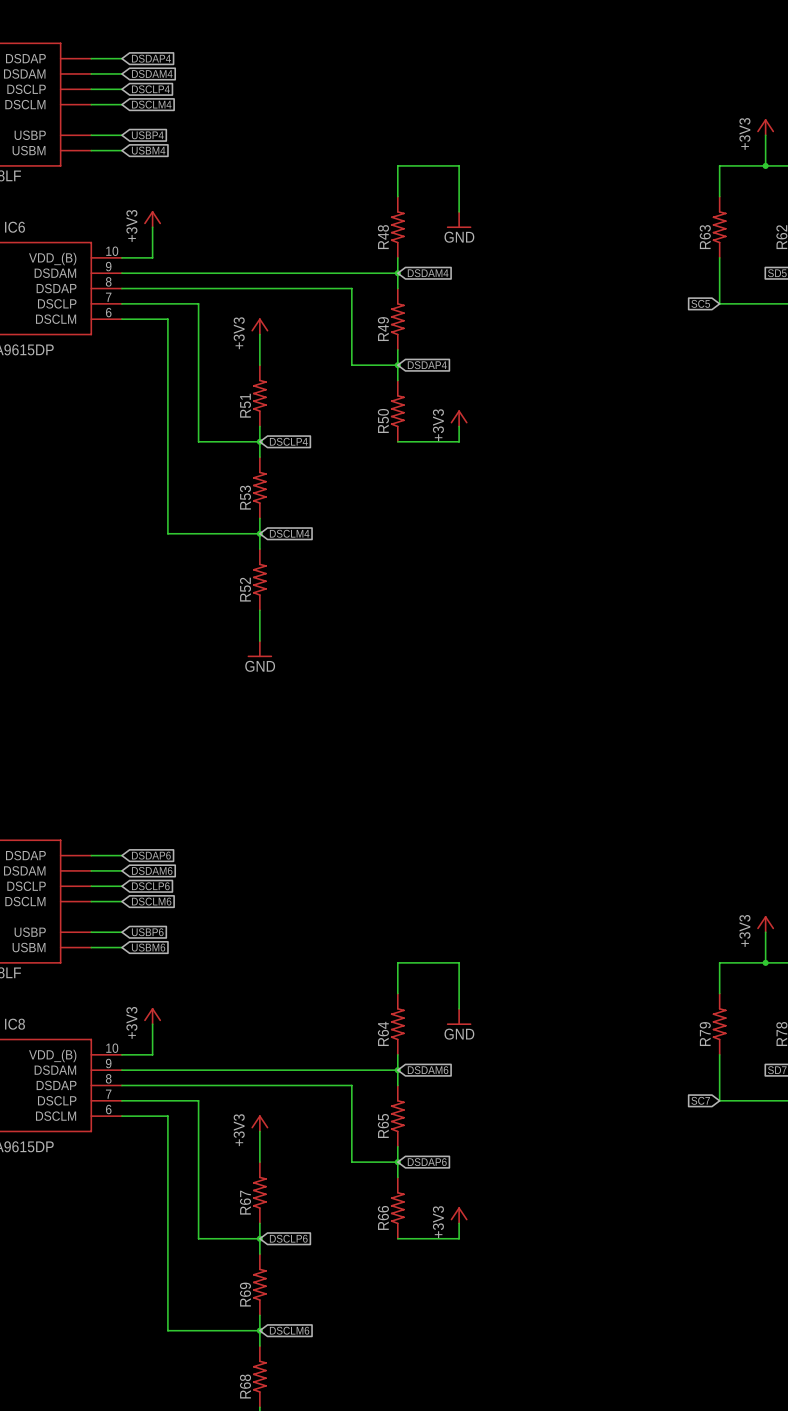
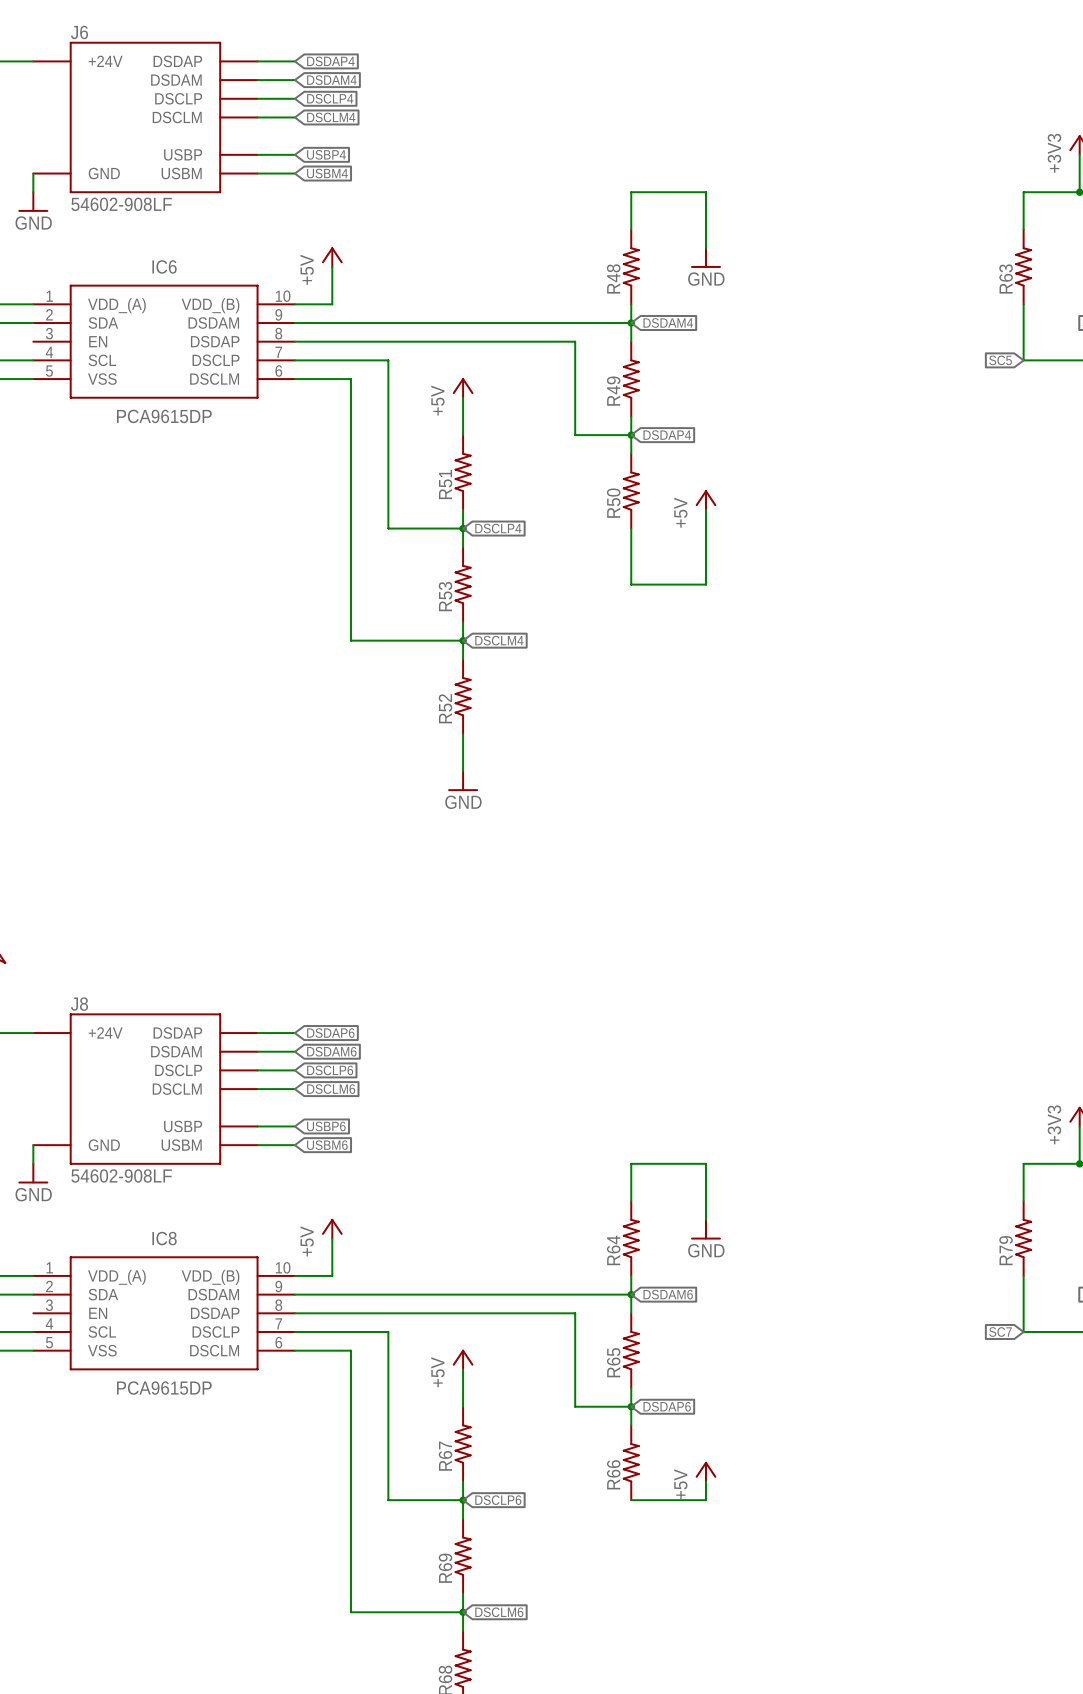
power symbol: +3V3 (152, 219) -> +5V (332, 257)
power symbol: +3V3 (259, 326) -> +5V (463, 387)
power symbol: +3V3 (459, 418) -> +5V (705, 500)
wire: (397, 441) (459, 441) -> (631, 528) (631, 584) (705, 584) (705, 528)
power symbol: +3V3 (152, 1016) -> +5V (332, 1228)
power symbol: +3V3 (259, 1123) -> +5V (463, 1359)
power symbol: +3V3 (459, 1215) -> +5V (705, 1471)

